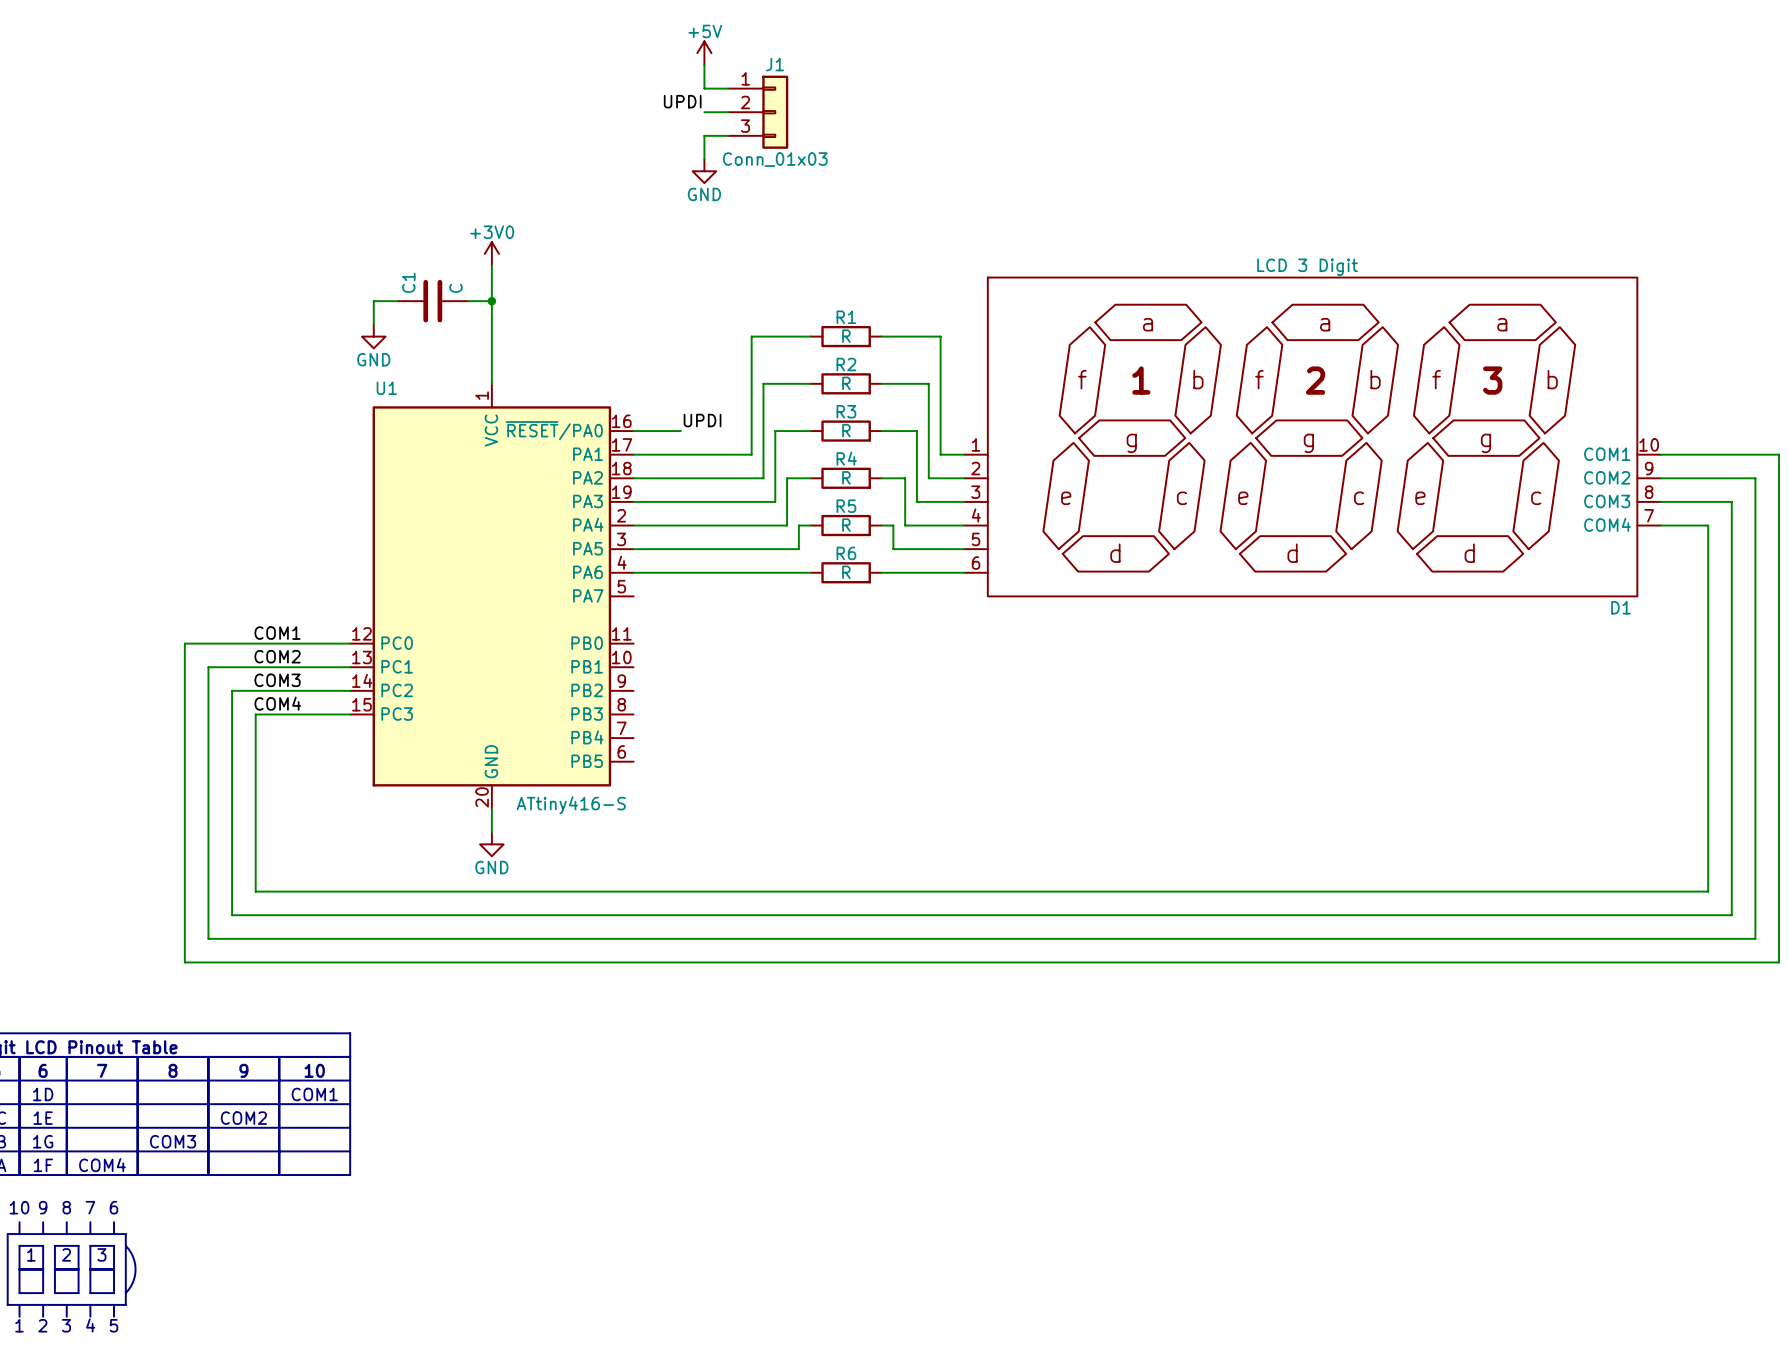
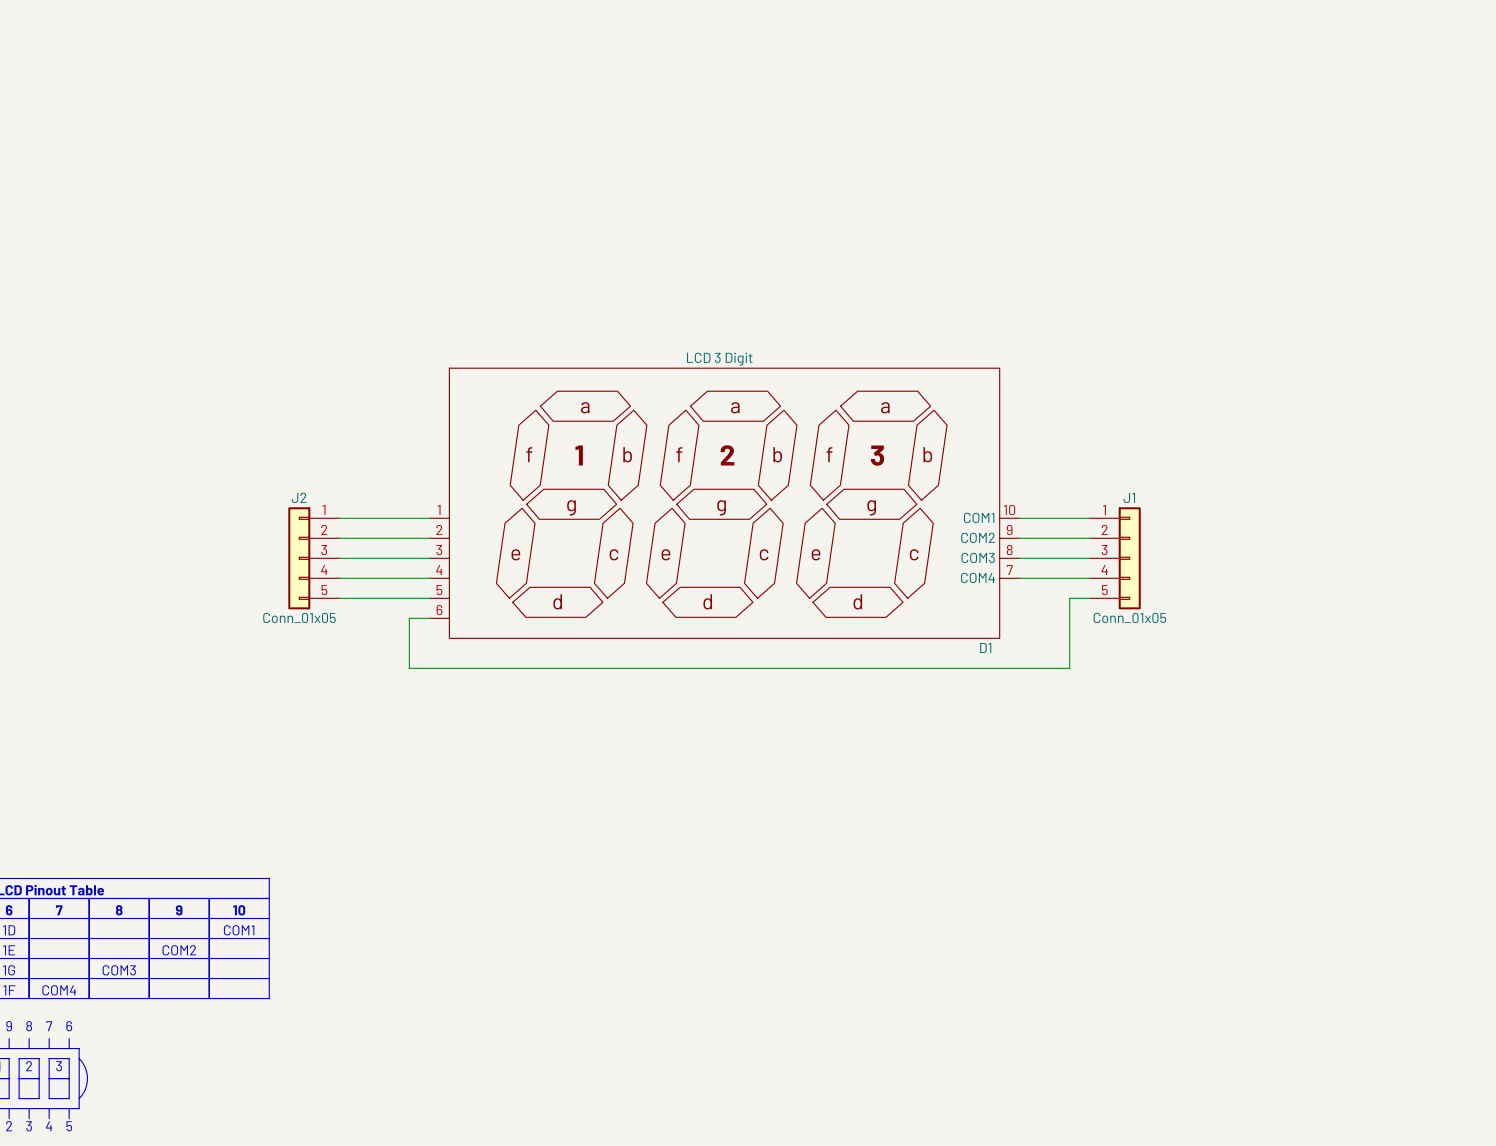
power symbol: +5V (704, 53) -> none
wire: (704, 64) (704, 88) (728, 88) -> none
J1 name position: J1 (775, 64) -> J1 (1129, 497)
J1 symbol: [728, 75, 789, 149] -> [1089, 507, 1141, 610]
label: UPDI (682, 101) -> none
wire: (704, 112) (728, 112) -> none
wire: (728, 135) (704, 135) (704, 159) -> none
J1 value: Conn_01x03 (775, 159) -> Conn_01x05 (1129, 617)
power symbol: GND (704, 171) -> none
power symbol: +3V0 (491, 253) -> none
wire: (491, 265) (491, 383) -> none
wire: (397, 301) (373, 301) (373, 324) -> none
C1: C (432, 301) -> none
wire: (468, 301) (491, 301) -> none
junction: (491, 301) -> none
power symbol: GND (373, 336) -> none
wire: (810, 336) (751, 336) (751, 454) (633, 454) -> none
R1: R (846, 336) -> none
wire: (881, 336) (940, 336) (940, 454) (964, 454) -> none
wire: (810, 383) (763, 383) (763, 478) (633, 478) -> none
R2: R (846, 383) -> none
wire: (881, 383) (928, 383) (928, 478) (964, 478) -> none
label: UPDI (702, 420) -> none
wire: (810, 431) (775, 431) (775, 501) (633, 501) -> none
R3: R (846, 431) -> none
wire: (881, 431) (916, 431) (916, 501) (964, 501) -> none
D1 position: (1312, 436) -> (724, 503)
wire: (1660, 454) (1779, 454) (1779, 962) (184, 962) (184, 643) (350, 643) -> none
wire: (810, 478) (787, 478) (787, 525) (633, 525) -> none
R4: R (846, 478) -> none
wire: (881, 478) (905, 478) (905, 525) (964, 525) -> none
wire: (1660, 478) (1755, 478) (1755, 938) (208, 938) (208, 667) (350, 667) -> none
wire: (1660, 501) (1731, 501) (1731, 915) (232, 915) (232, 690) (350, 690) -> none
wire: (810, 525) (798, 525) (798, 549) (633, 549) -> none
R5: R (846, 525) -> none
wire: (881, 525) (893, 525) (893, 549) (964, 549) -> none
wire: (1660, 525) (1708, 525) (1708, 891) (255, 891) (255, 714) (350, 714) -> none
wire: (633, 572) (810, 572) -> none
R6: R (846, 572) -> none
wire: (881, 572) (964, 572) -> none
U1: ATtiny416-S (491, 596) -> none
wire: none -> (1019, 518) (1089, 518)
wire: none -> (1019, 538) (1089, 538)
label: COM1 (277, 633) -> none
J2: none -> Conn_01x05 (313, 558)
wire: none -> (1019, 558) (1089, 558)
label: COM2 (277, 656) -> none
wire: none -> (1019, 578) (1089, 578)
label: COM3 (277, 680) -> none
wire: none -> (1089, 598) (1069, 598) (1069, 668) (409, 668) (409, 618) (429, 618)
label: COM4 (277, 703) -> none
wire: (491, 808) (491, 832) -> none
power symbol: GND (491, 844) -> none

